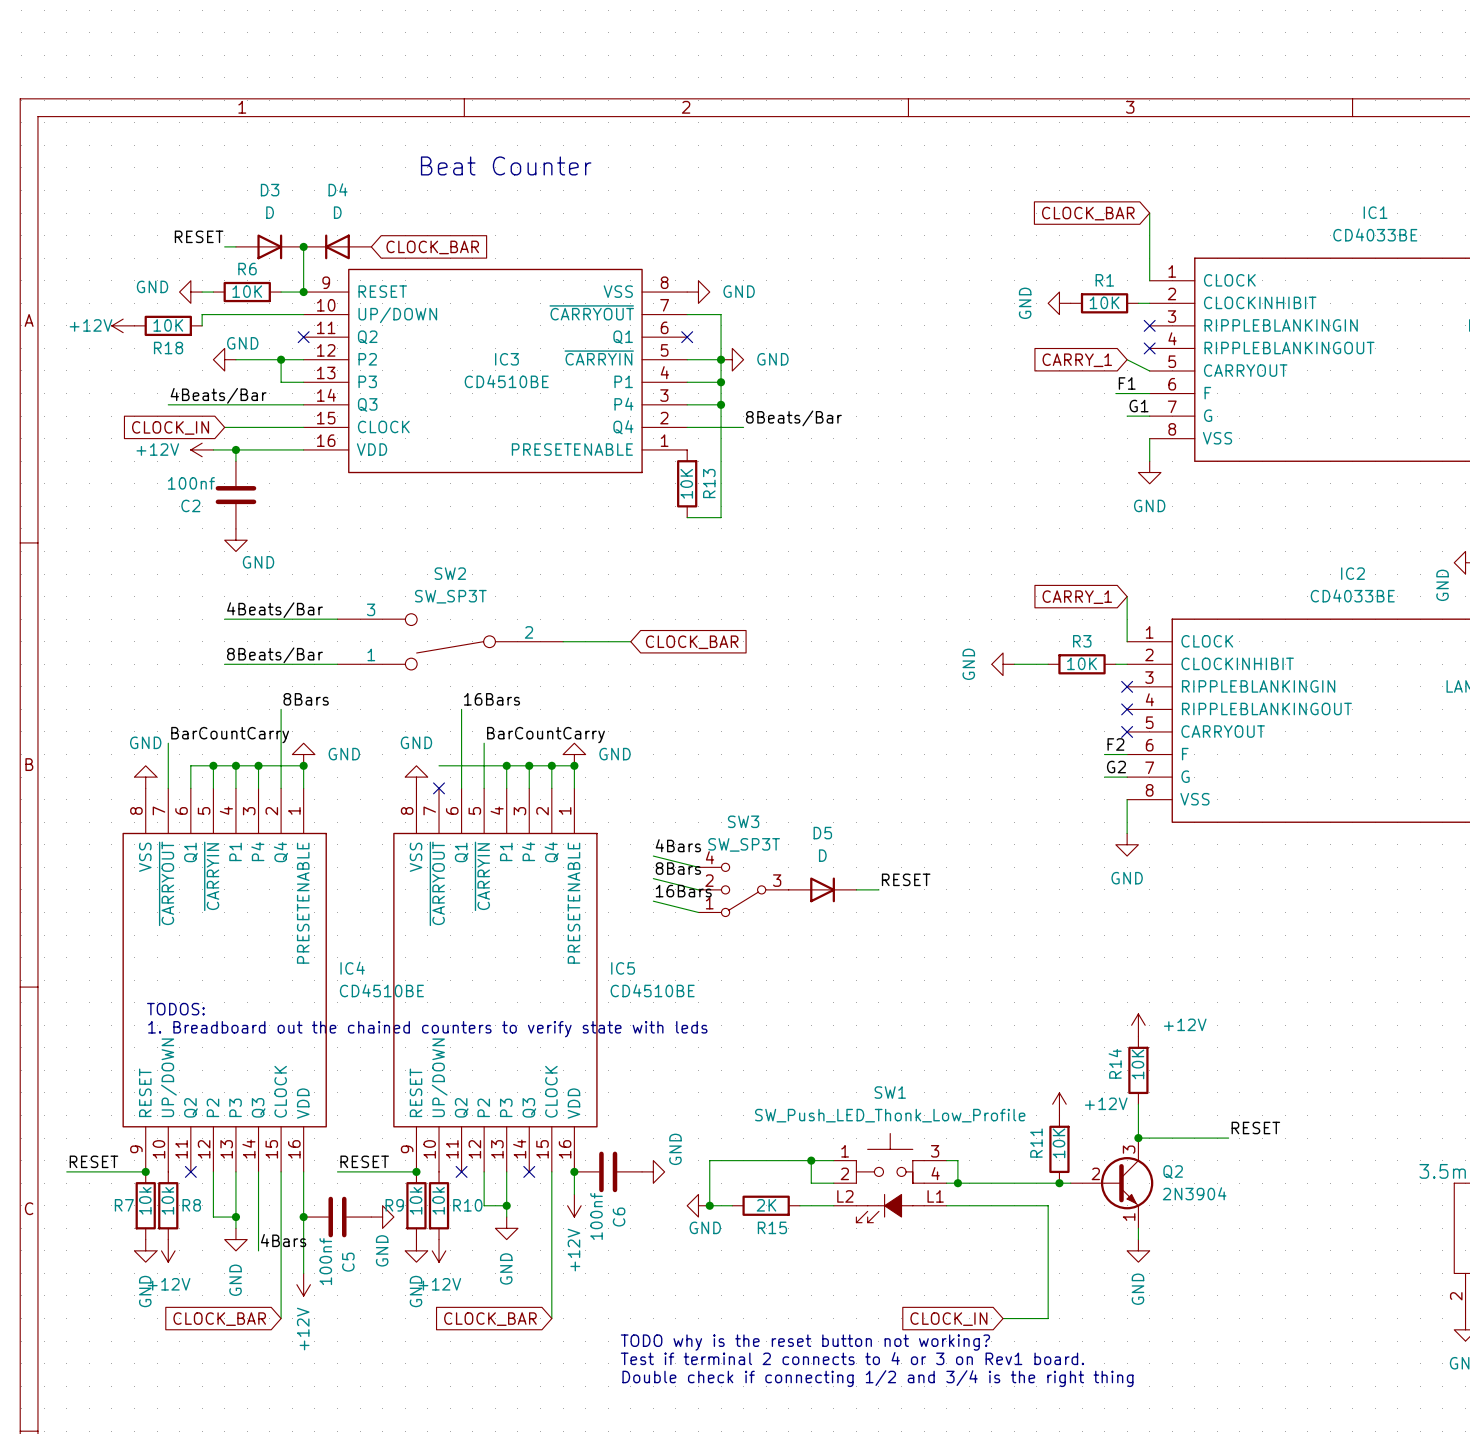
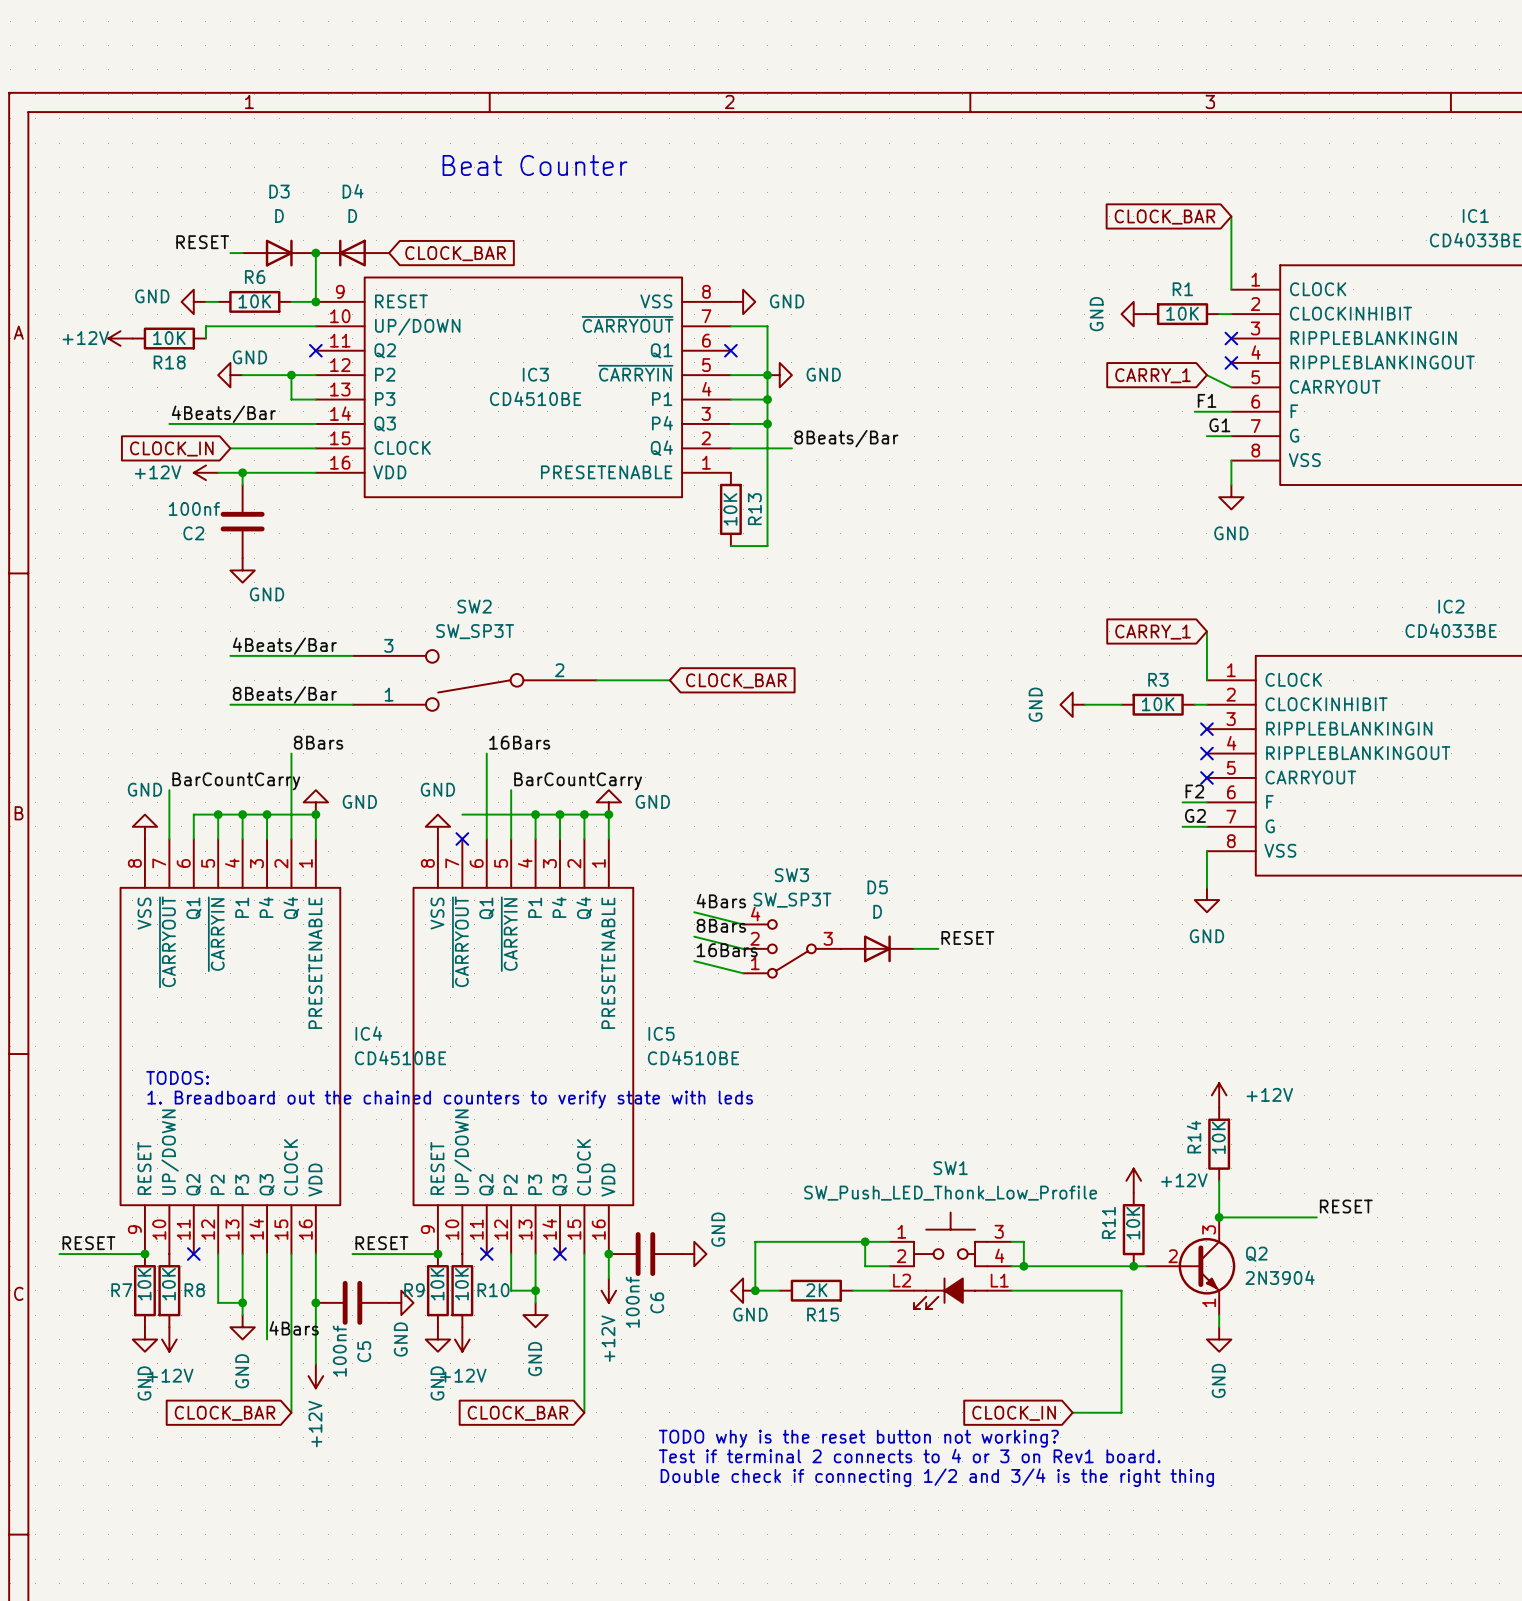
R7 value: 10k (145, 1200) -> 10K (144, 1284)
R8 value: 10k (167, 1200) -> 10K (168, 1284)
R9 value: 10k (416, 1200) -> 10K (437, 1284)
R10 value: 10k (438, 1200) -> 10K (461, 1284)

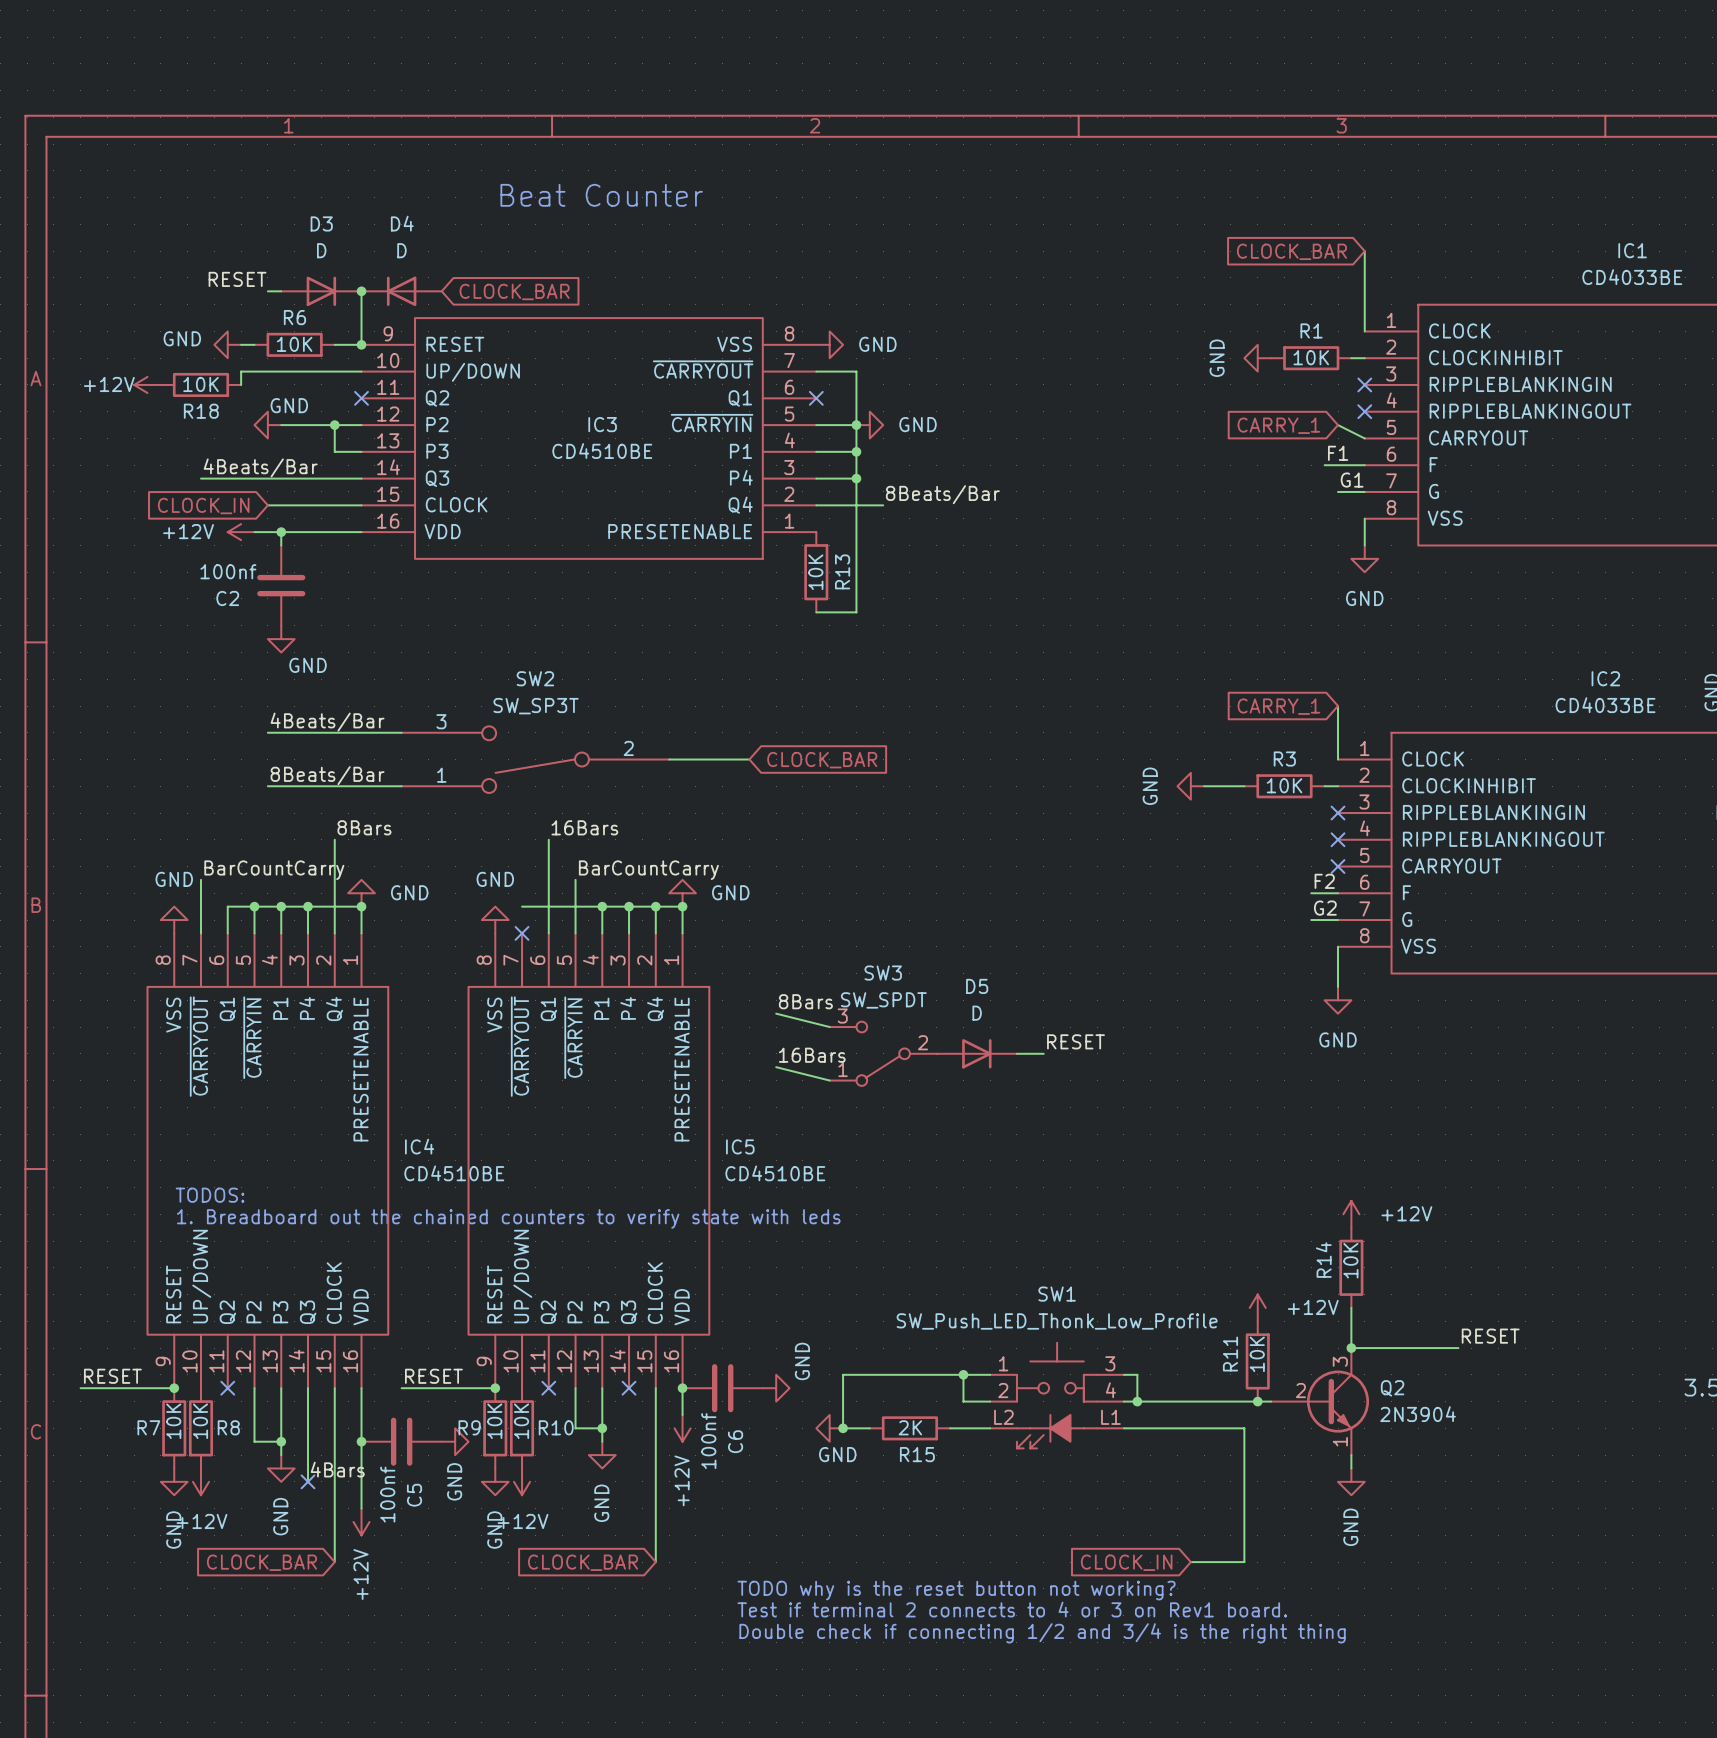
SW3 value: SW_SP3T (792, 900) -> SW_SPDT (883, 1000)
label: 4Bars (721, 901) -> 8Bars (805, 1001)
SW3 symbol: [743, 920, 841, 978] -> [829, 1021, 937, 1086]
label: 8Bars (721, 925) -> none
wire: (694, 936) (743, 948) -> none
no-connect mark: none -> (308, 1481)

